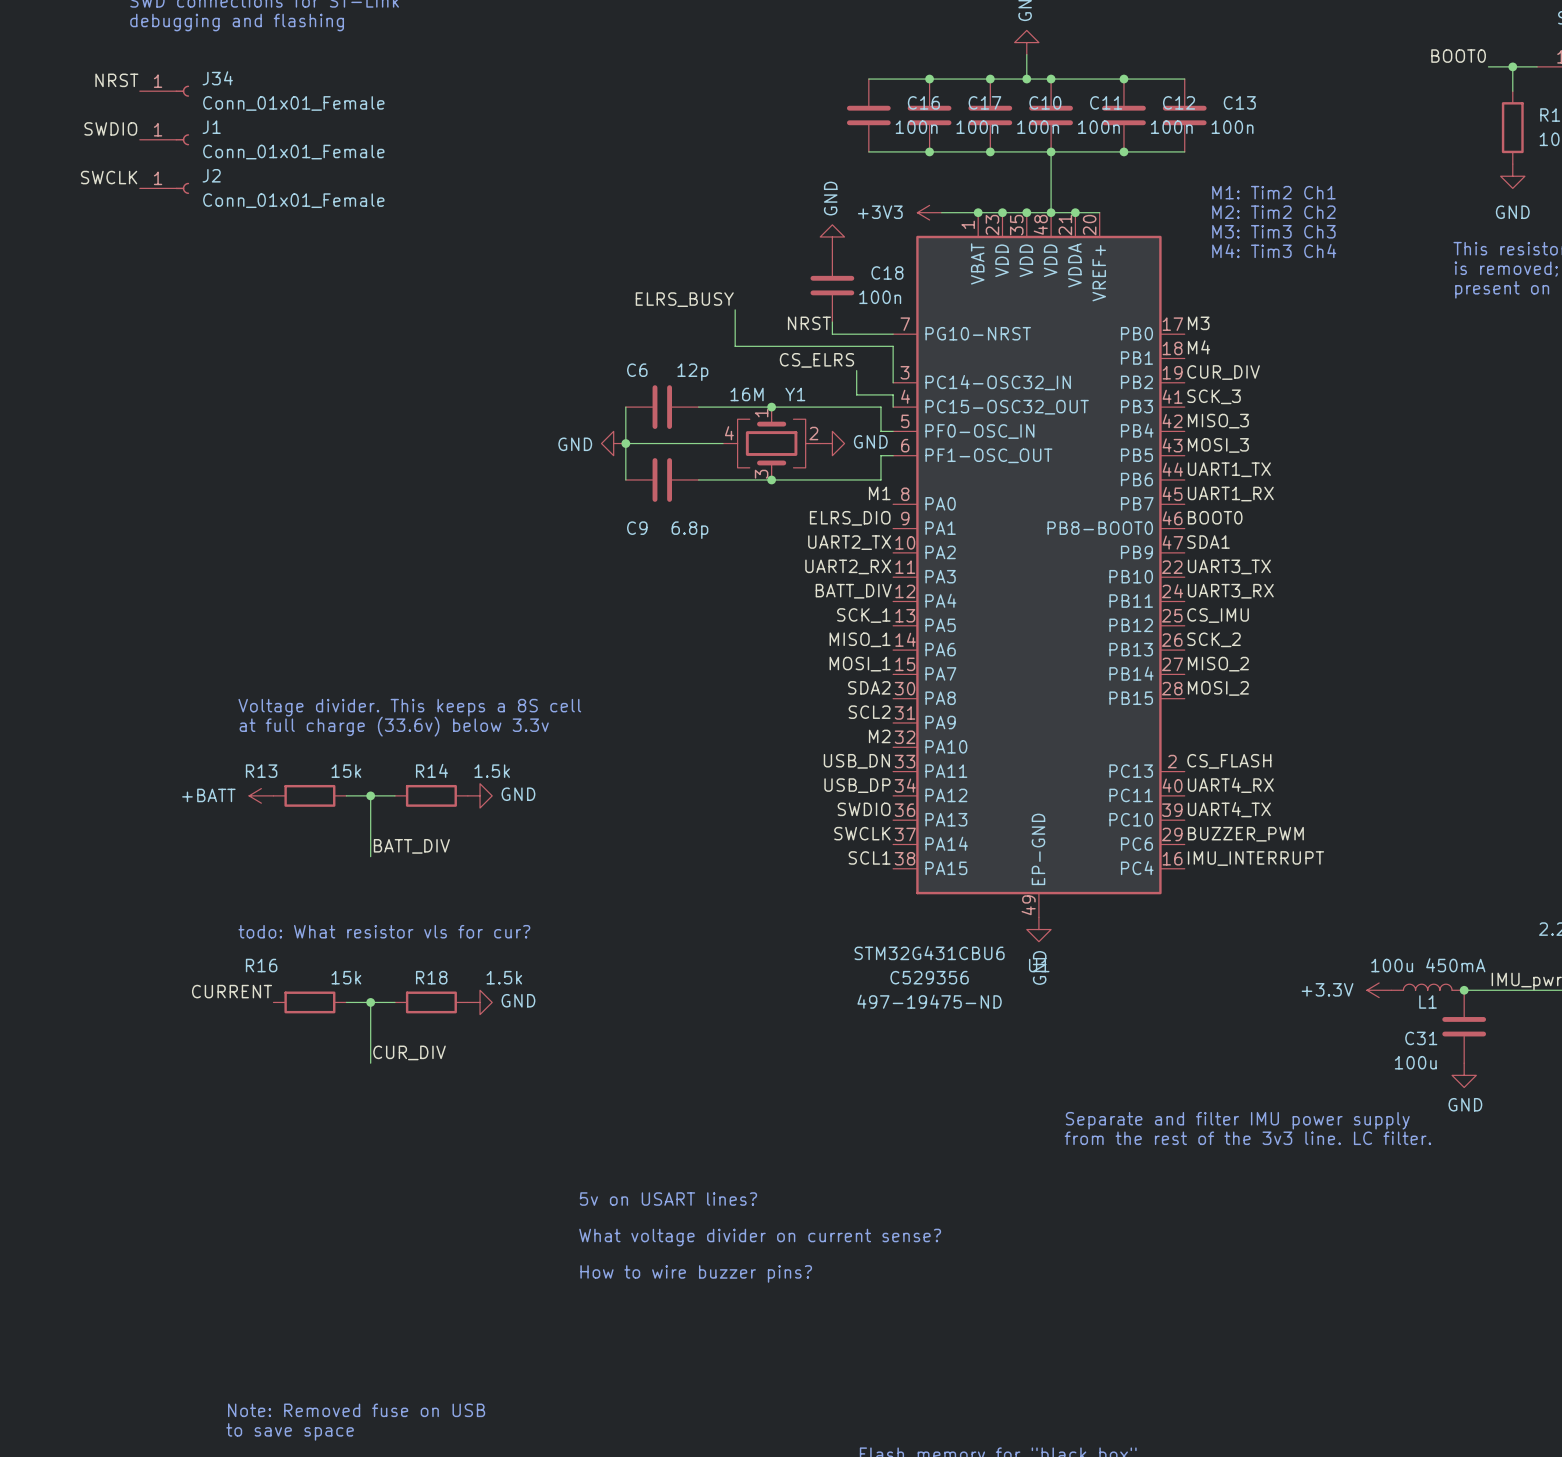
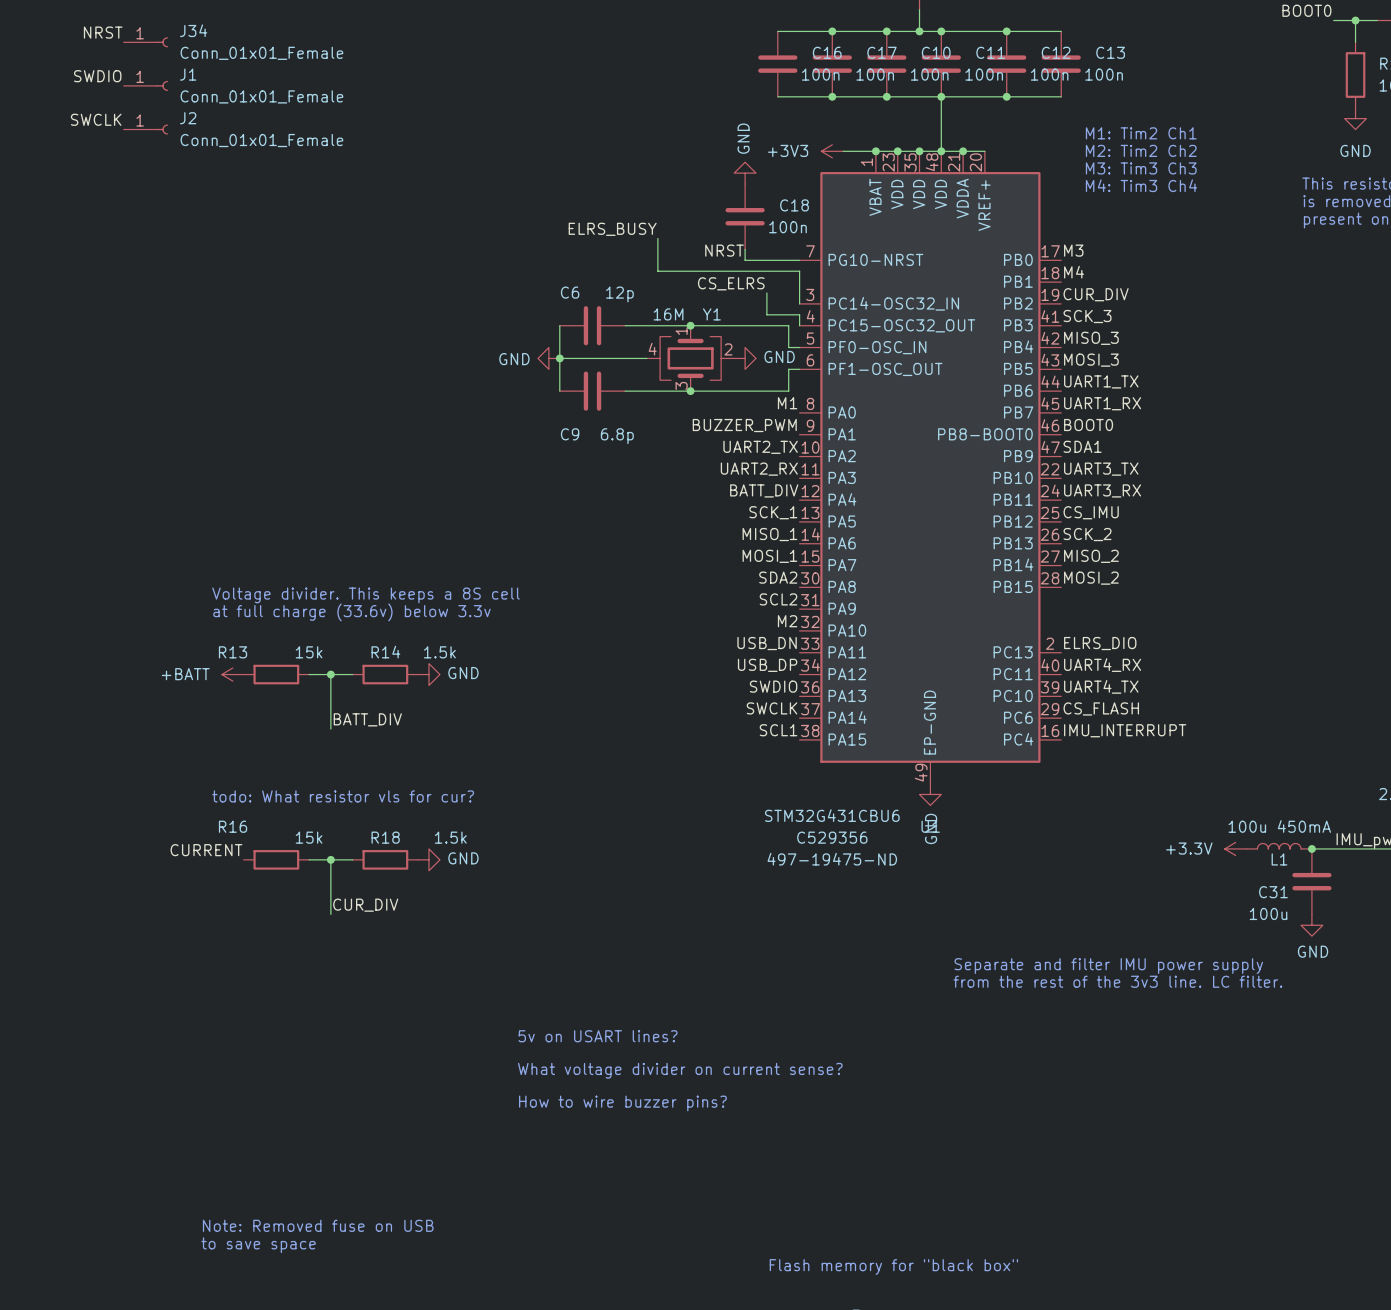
label: ELRS_DIO (850, 518) -> BUZZER_PWM (744, 425)
label: CS_FLASH (1229, 761) -> ELRS_DIO (1100, 643)
label: BUZZER_PWM (1245, 834) -> CS_FLASH (1101, 708)

